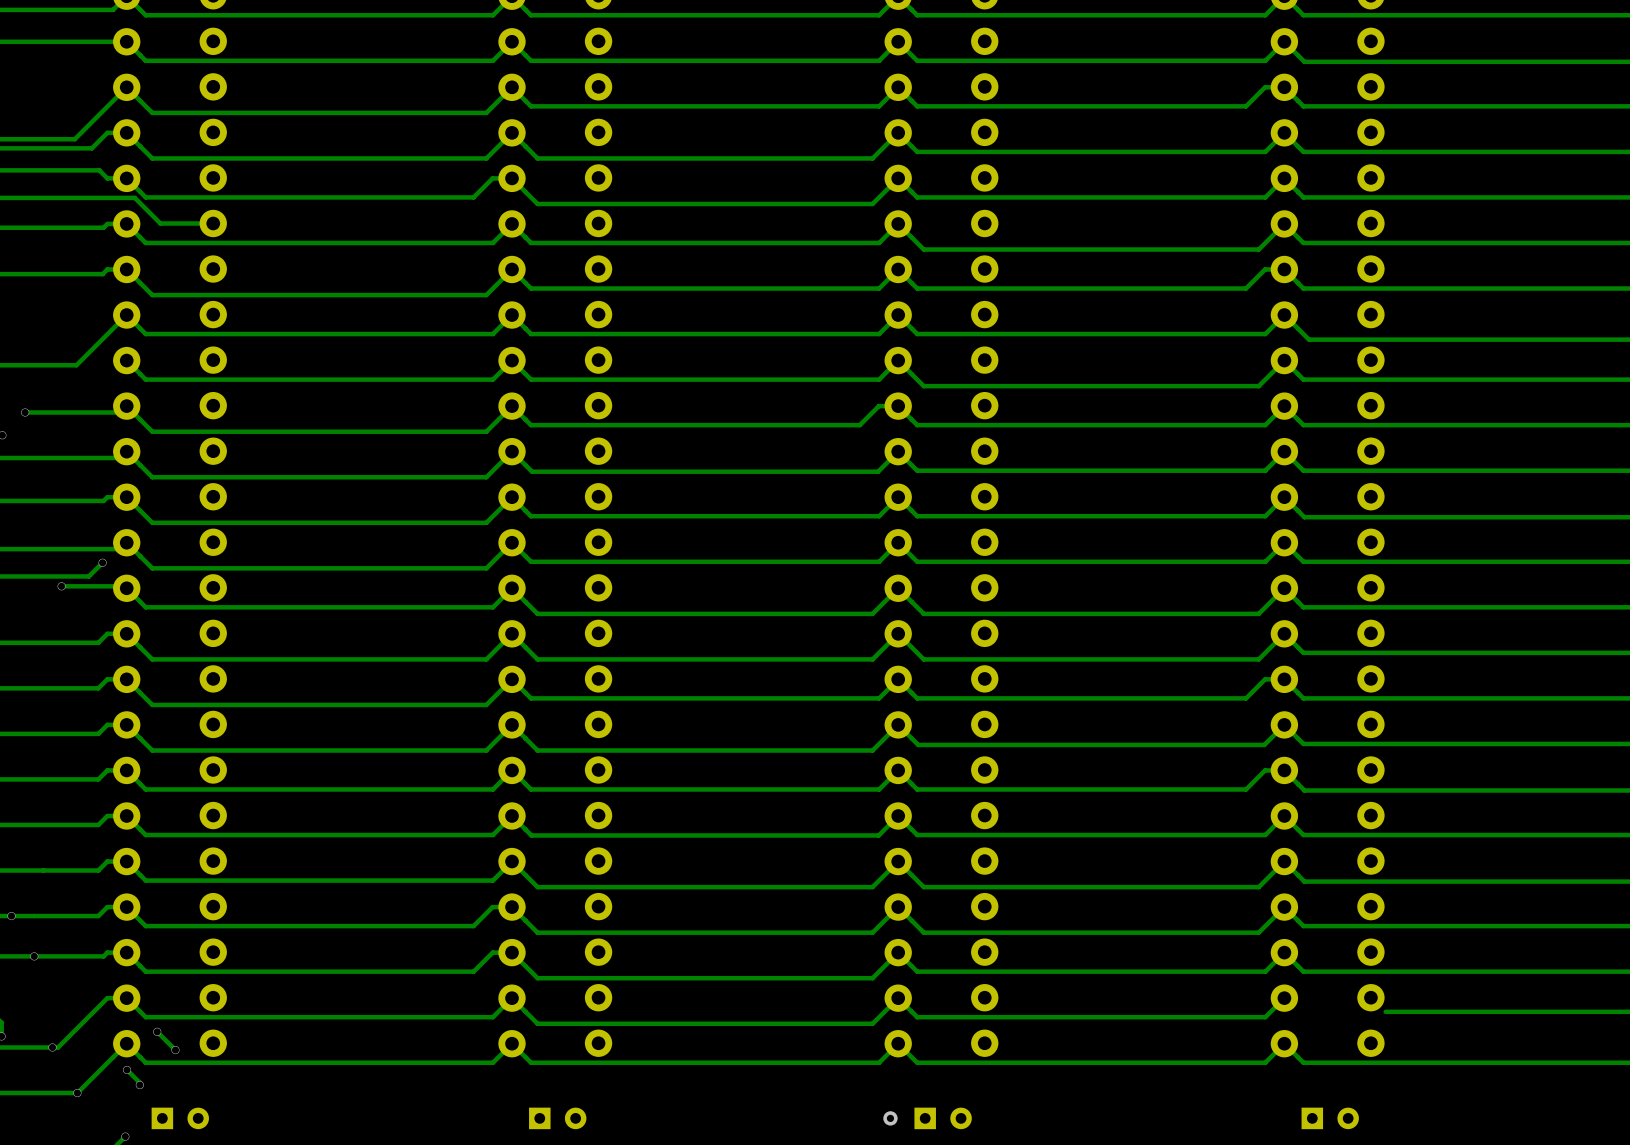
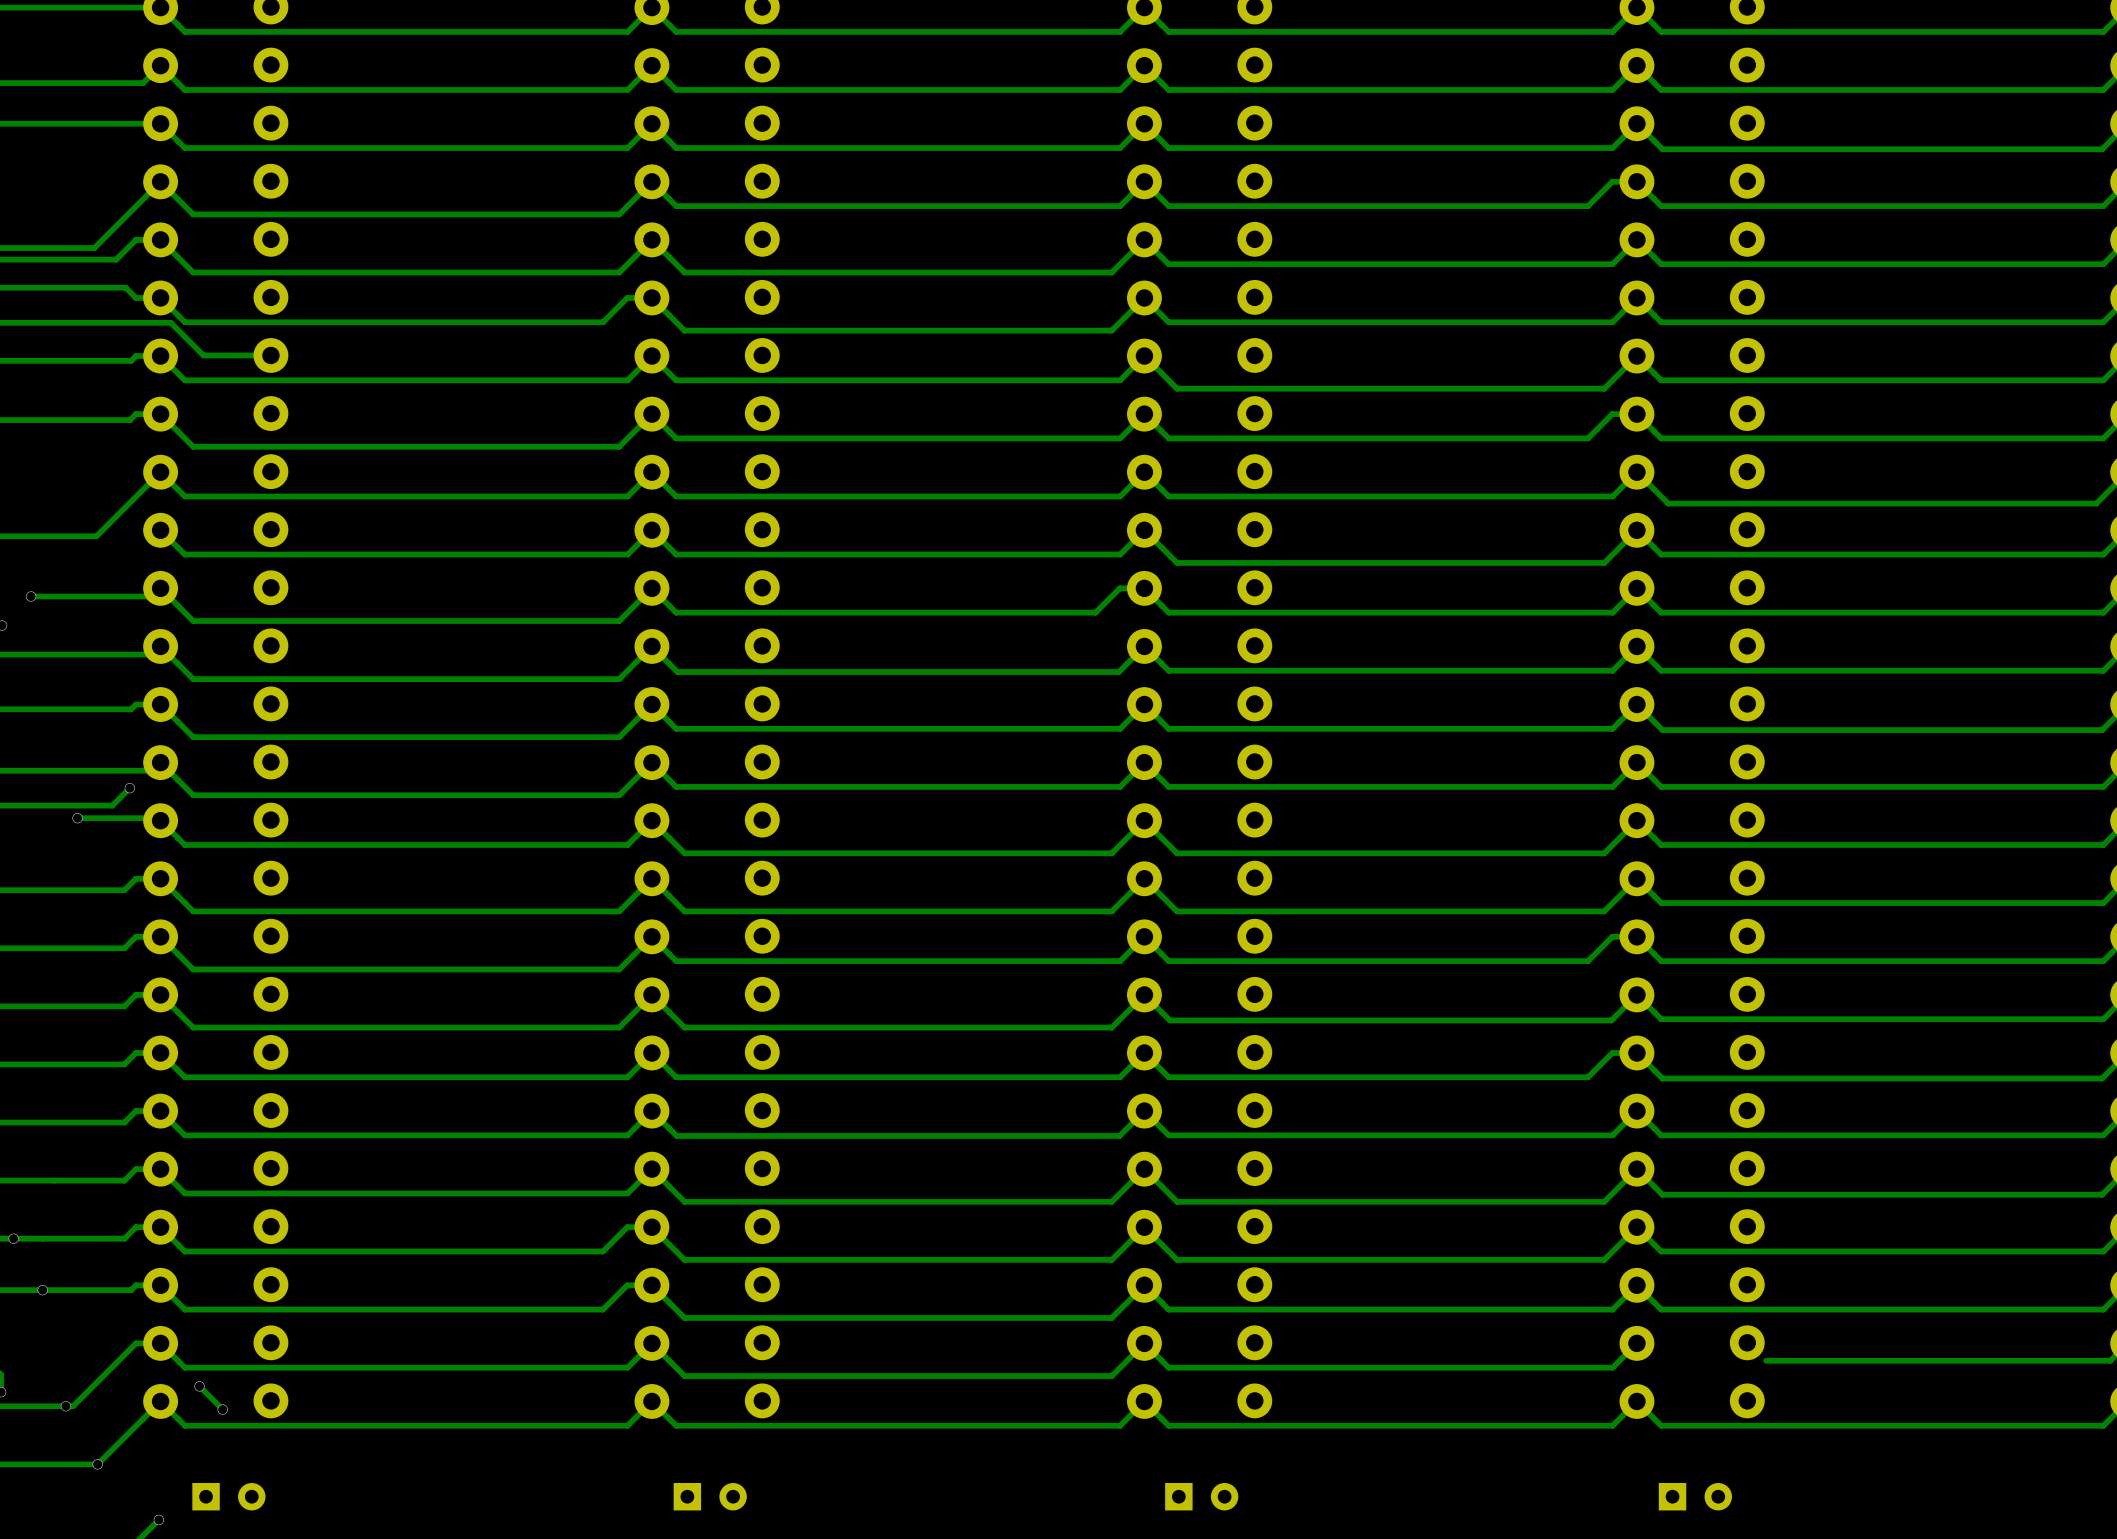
track: (127, 1069) (139, 1085) -> none
via: (127, 1069) -> none
via: (139, 1085) -> none
via: (890, 1118) -> none

